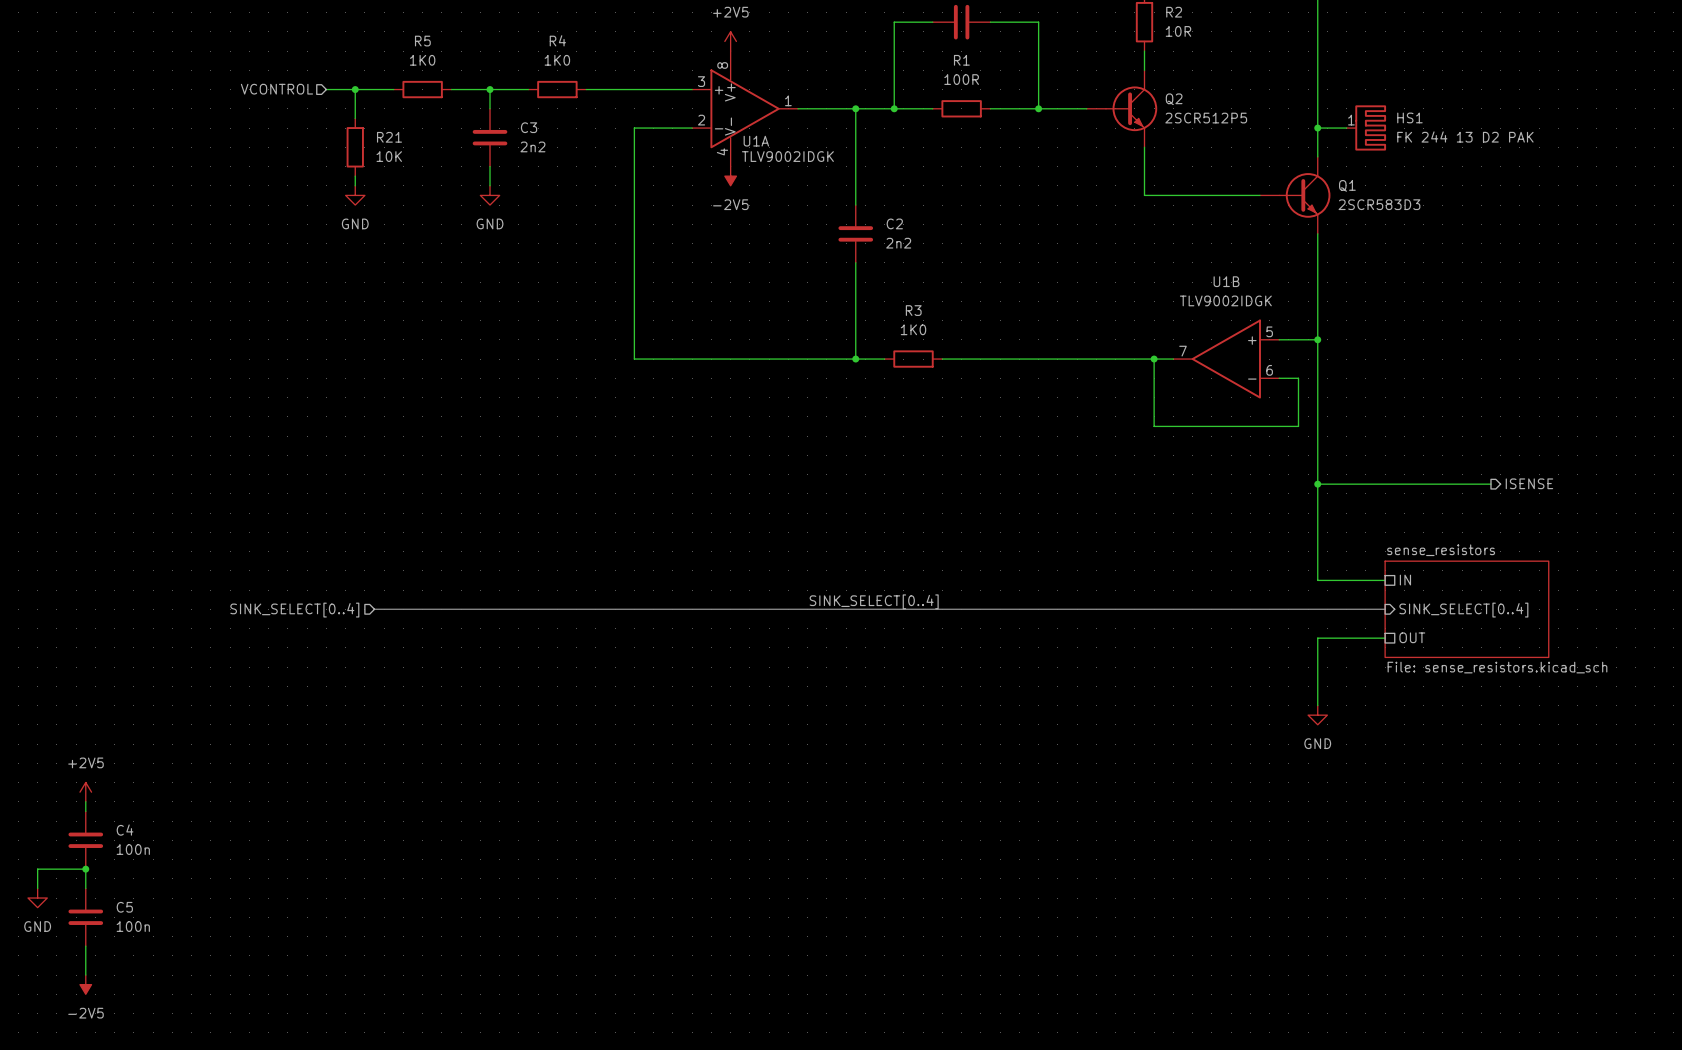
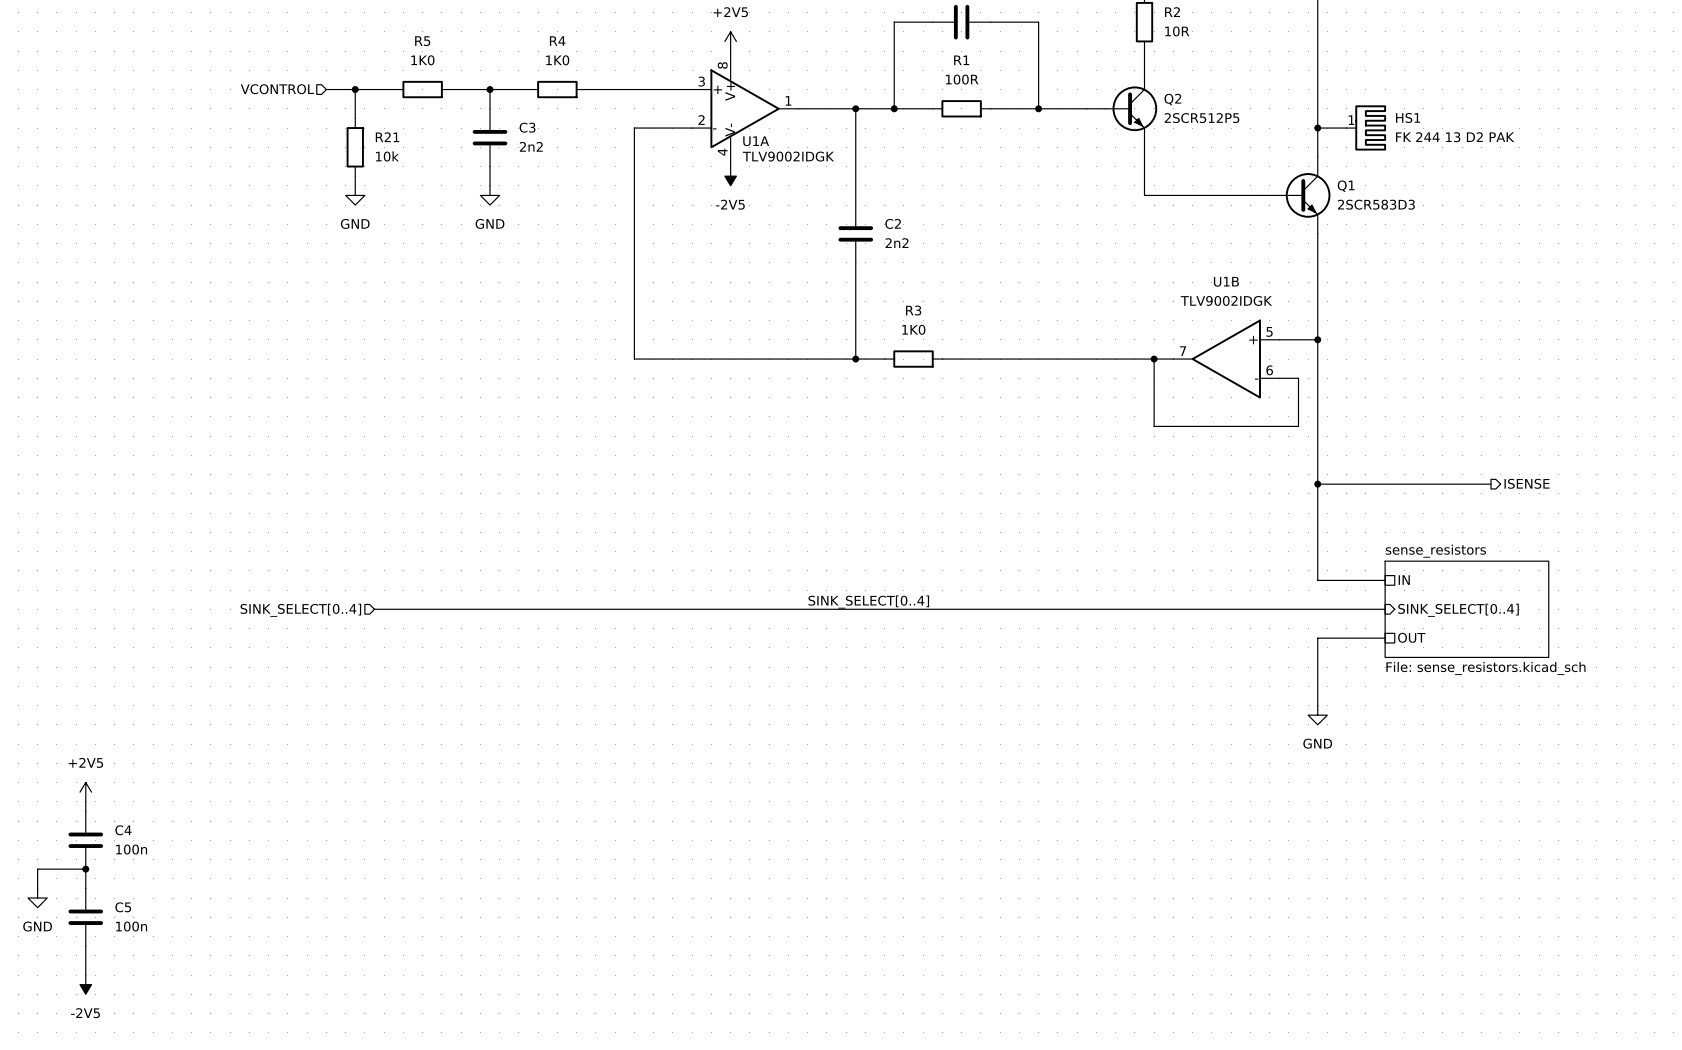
R21 value: 10K (389, 156) -> 10k (387, 156)

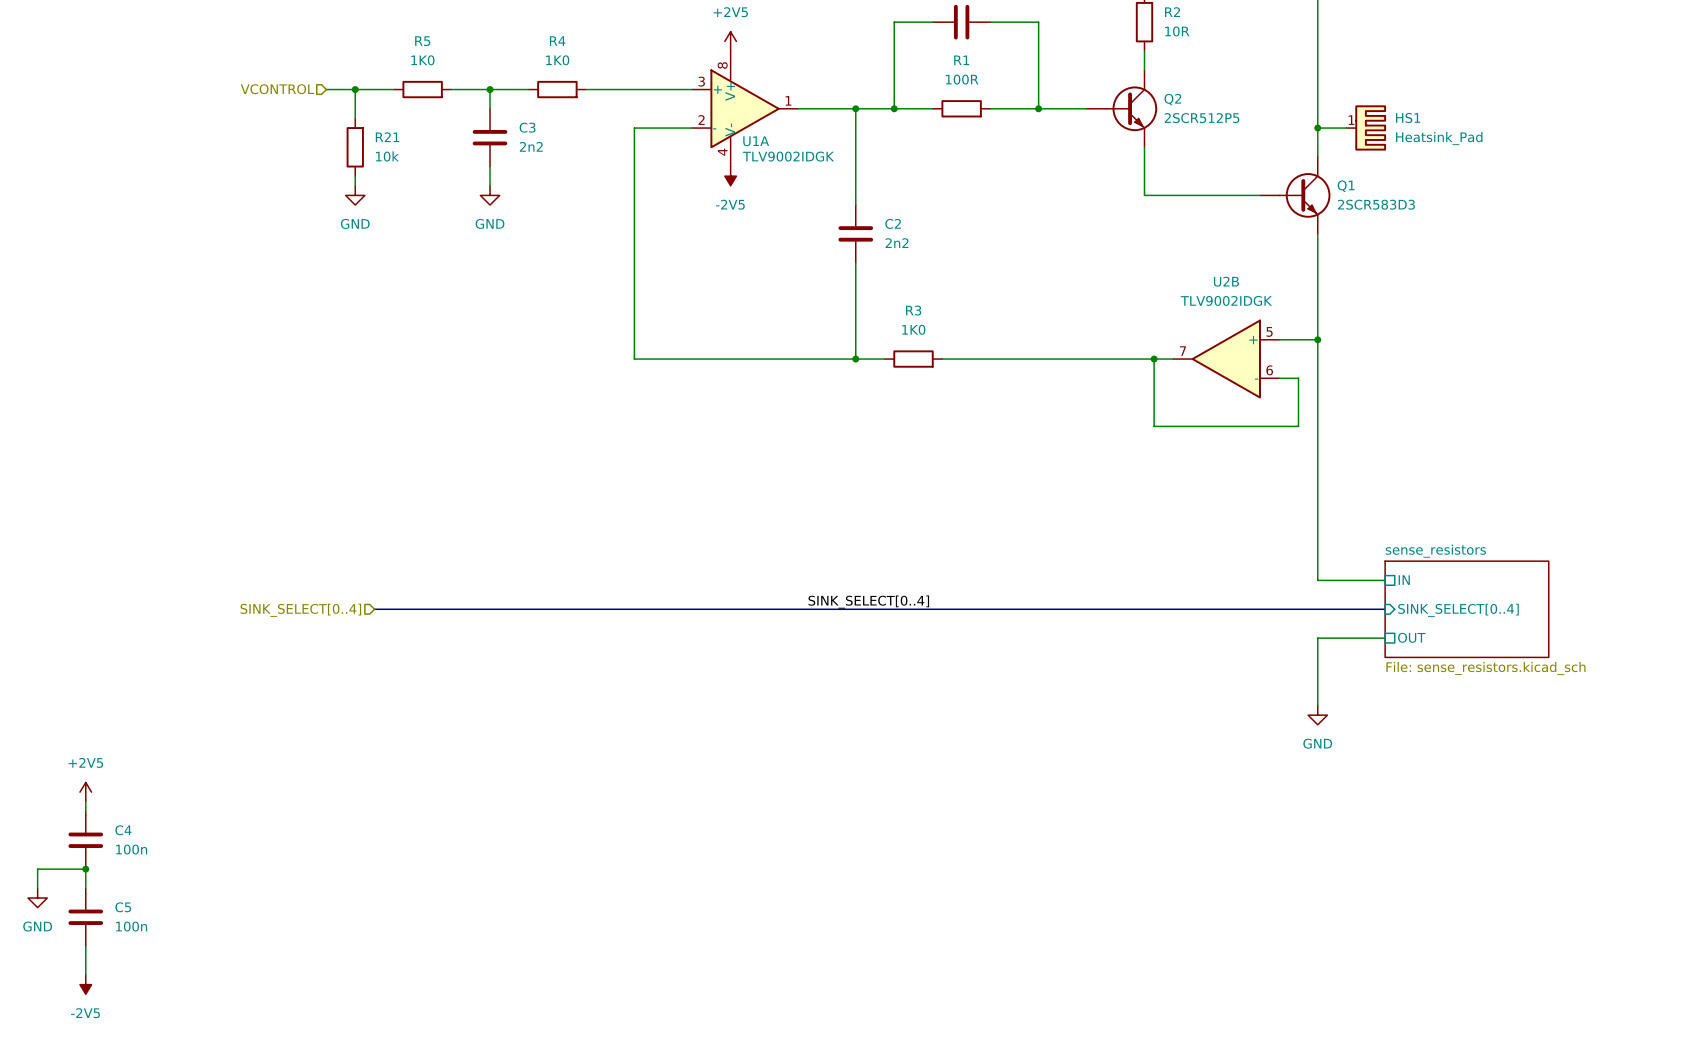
HS1 value: FK 244 13 D2 PAK (1455, 137) -> Heatsink_Pad (1439, 138)
U1B name: U1B (1226, 281) -> U2B (1226, 281)
hierarchical label: ISENSE (1527, 483) -> none
wire: (1317, 484) (1490, 484) -> none
junction: (1317, 484) -> none

